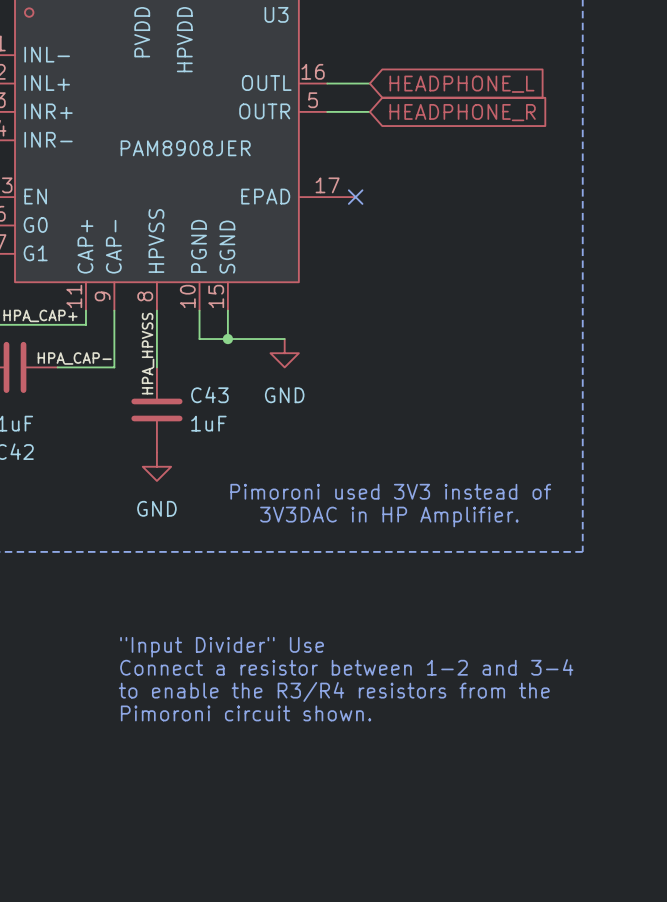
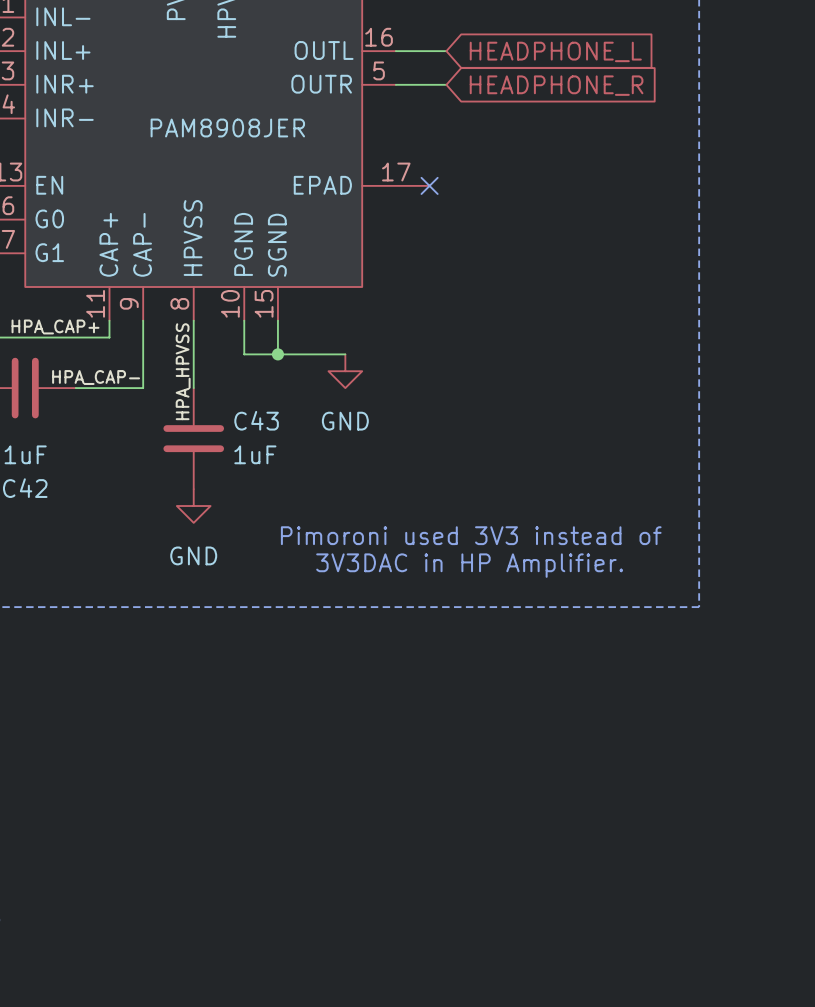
text: "Input Divider" Use (222, 647) -> none
text: Connect a resistor between 1-2 and 3-4 (346, 667) -> none
text: to enable the R3/R4 resistors from the (334, 691) -> none
text: Pimoroni circuit shown. (246, 713) -> none

